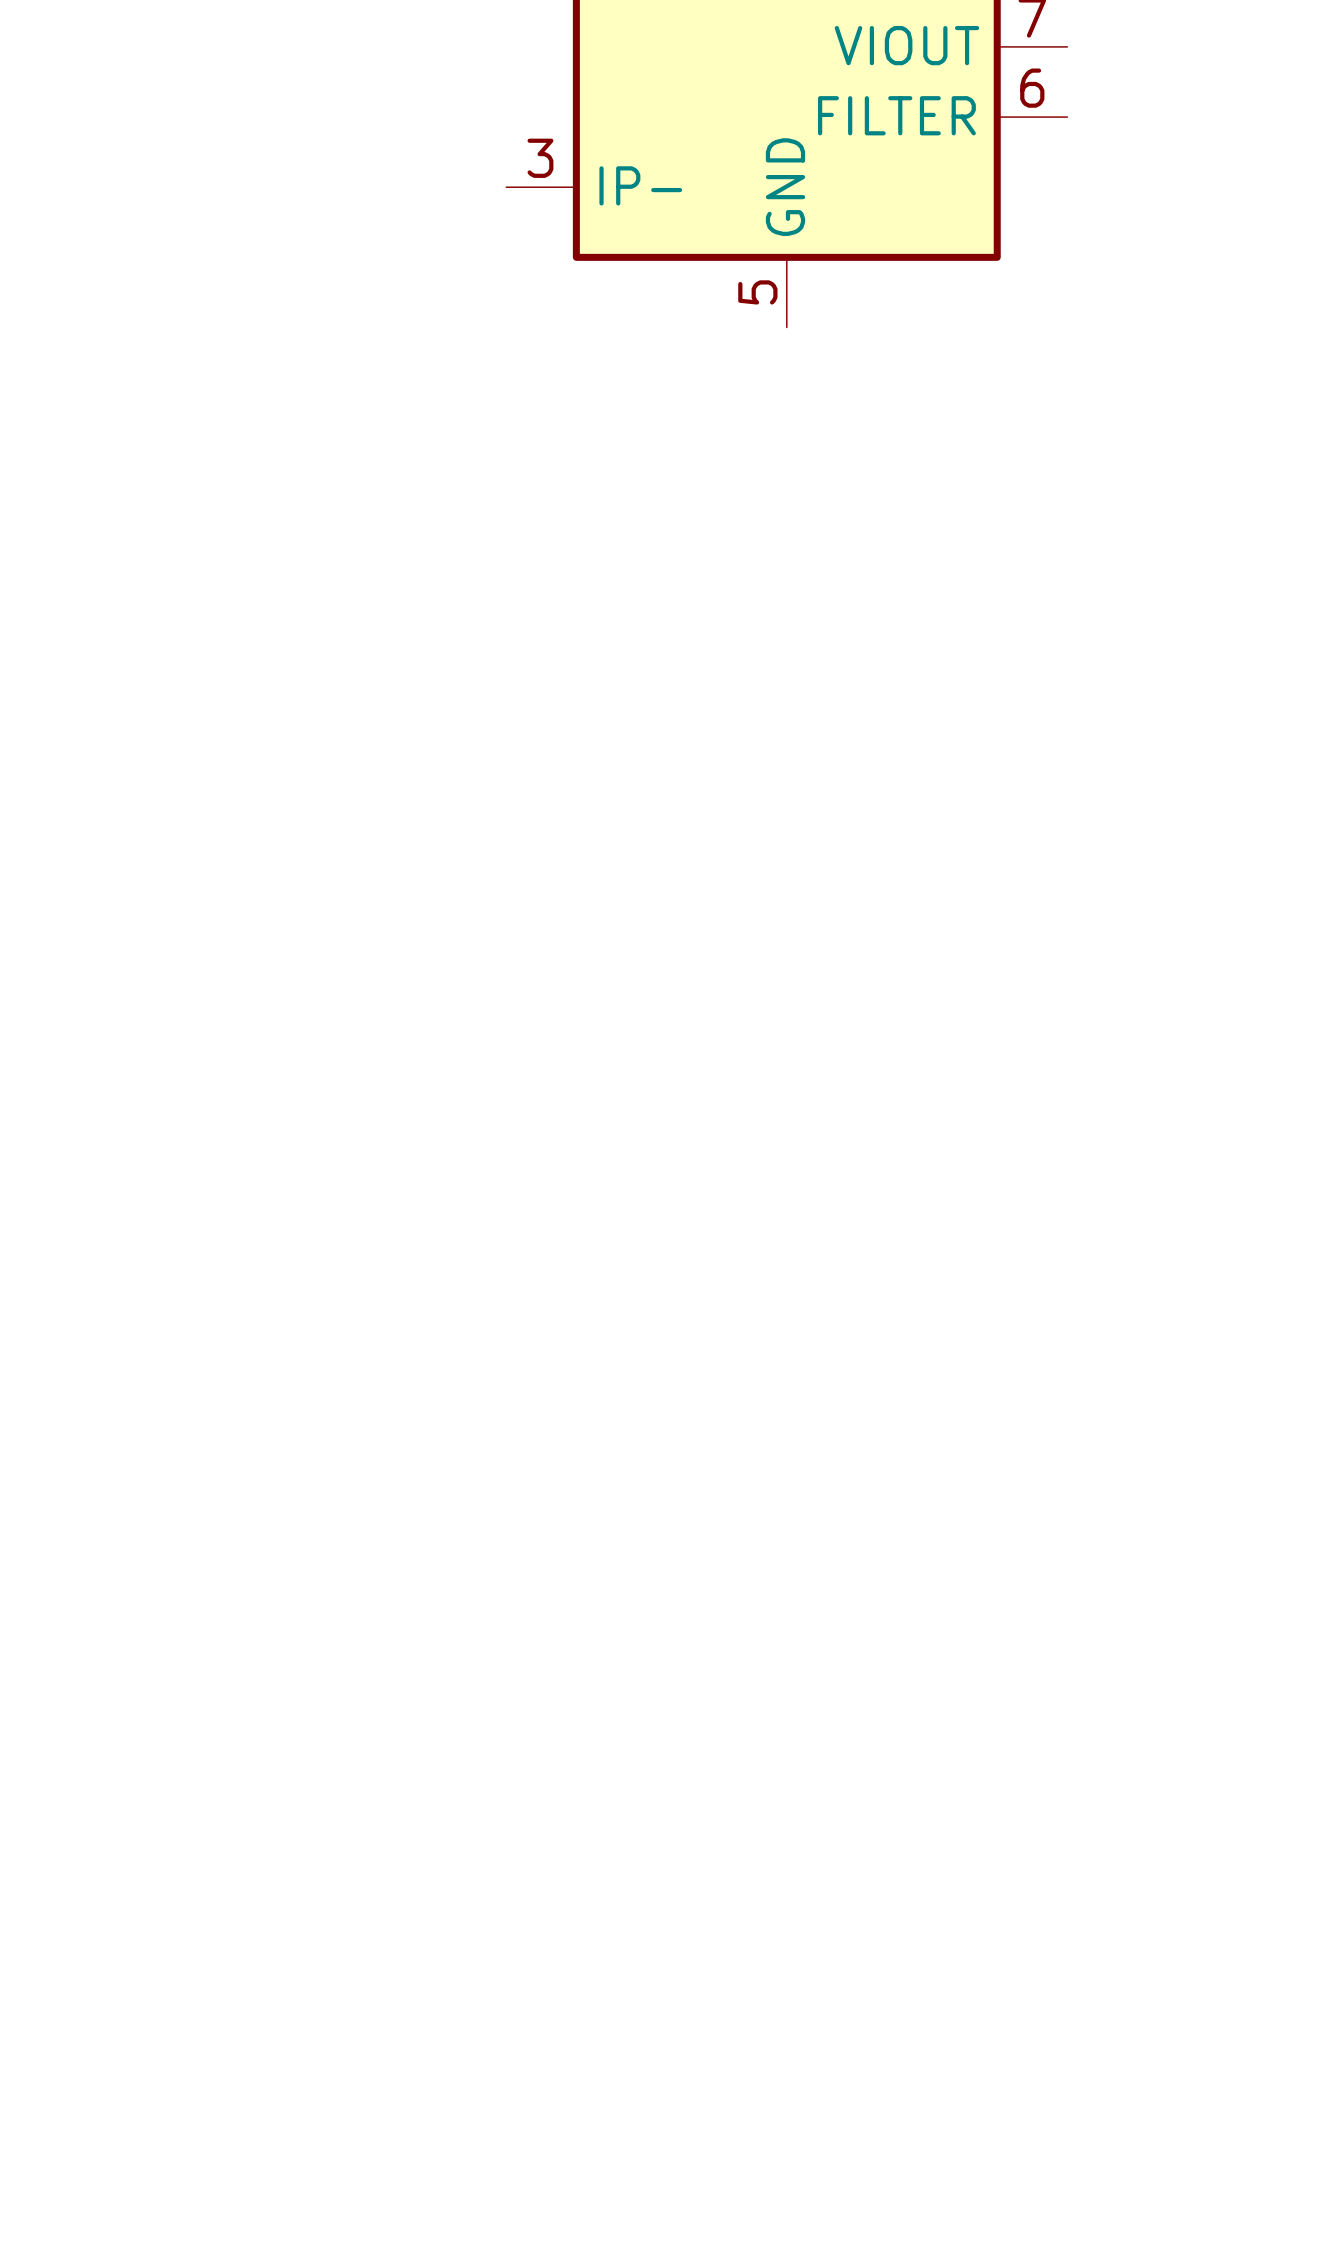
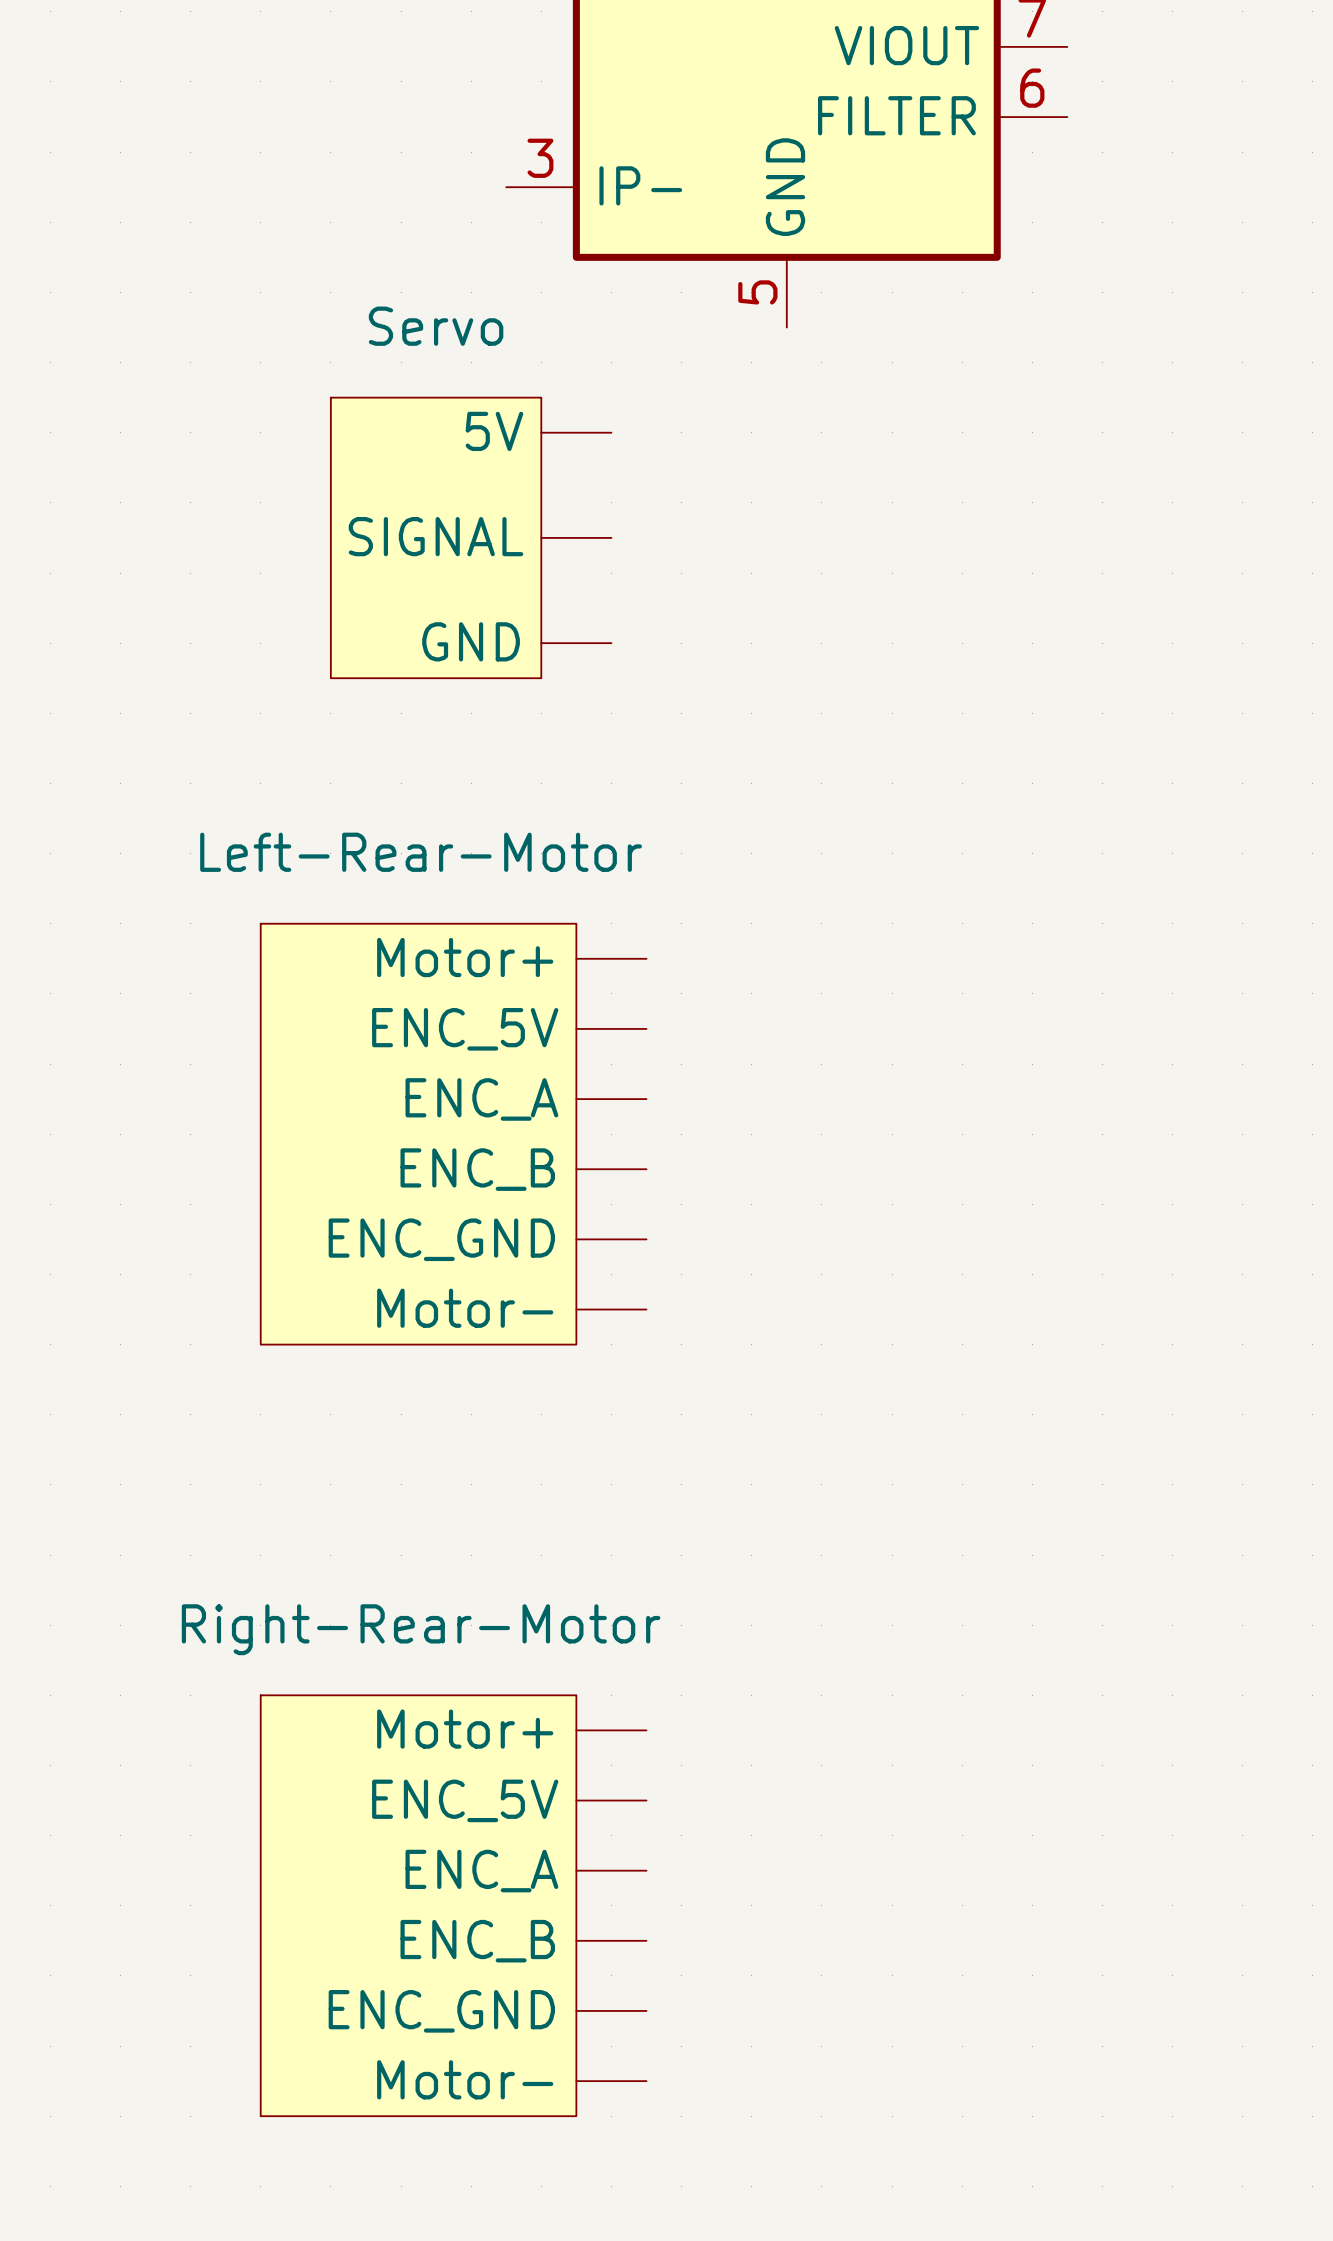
Servo: none -> (471, 537)
Left-Rear-Motor: none -> (453, 1134)
Right-Rear-Motor: none -> (453, 1905)

